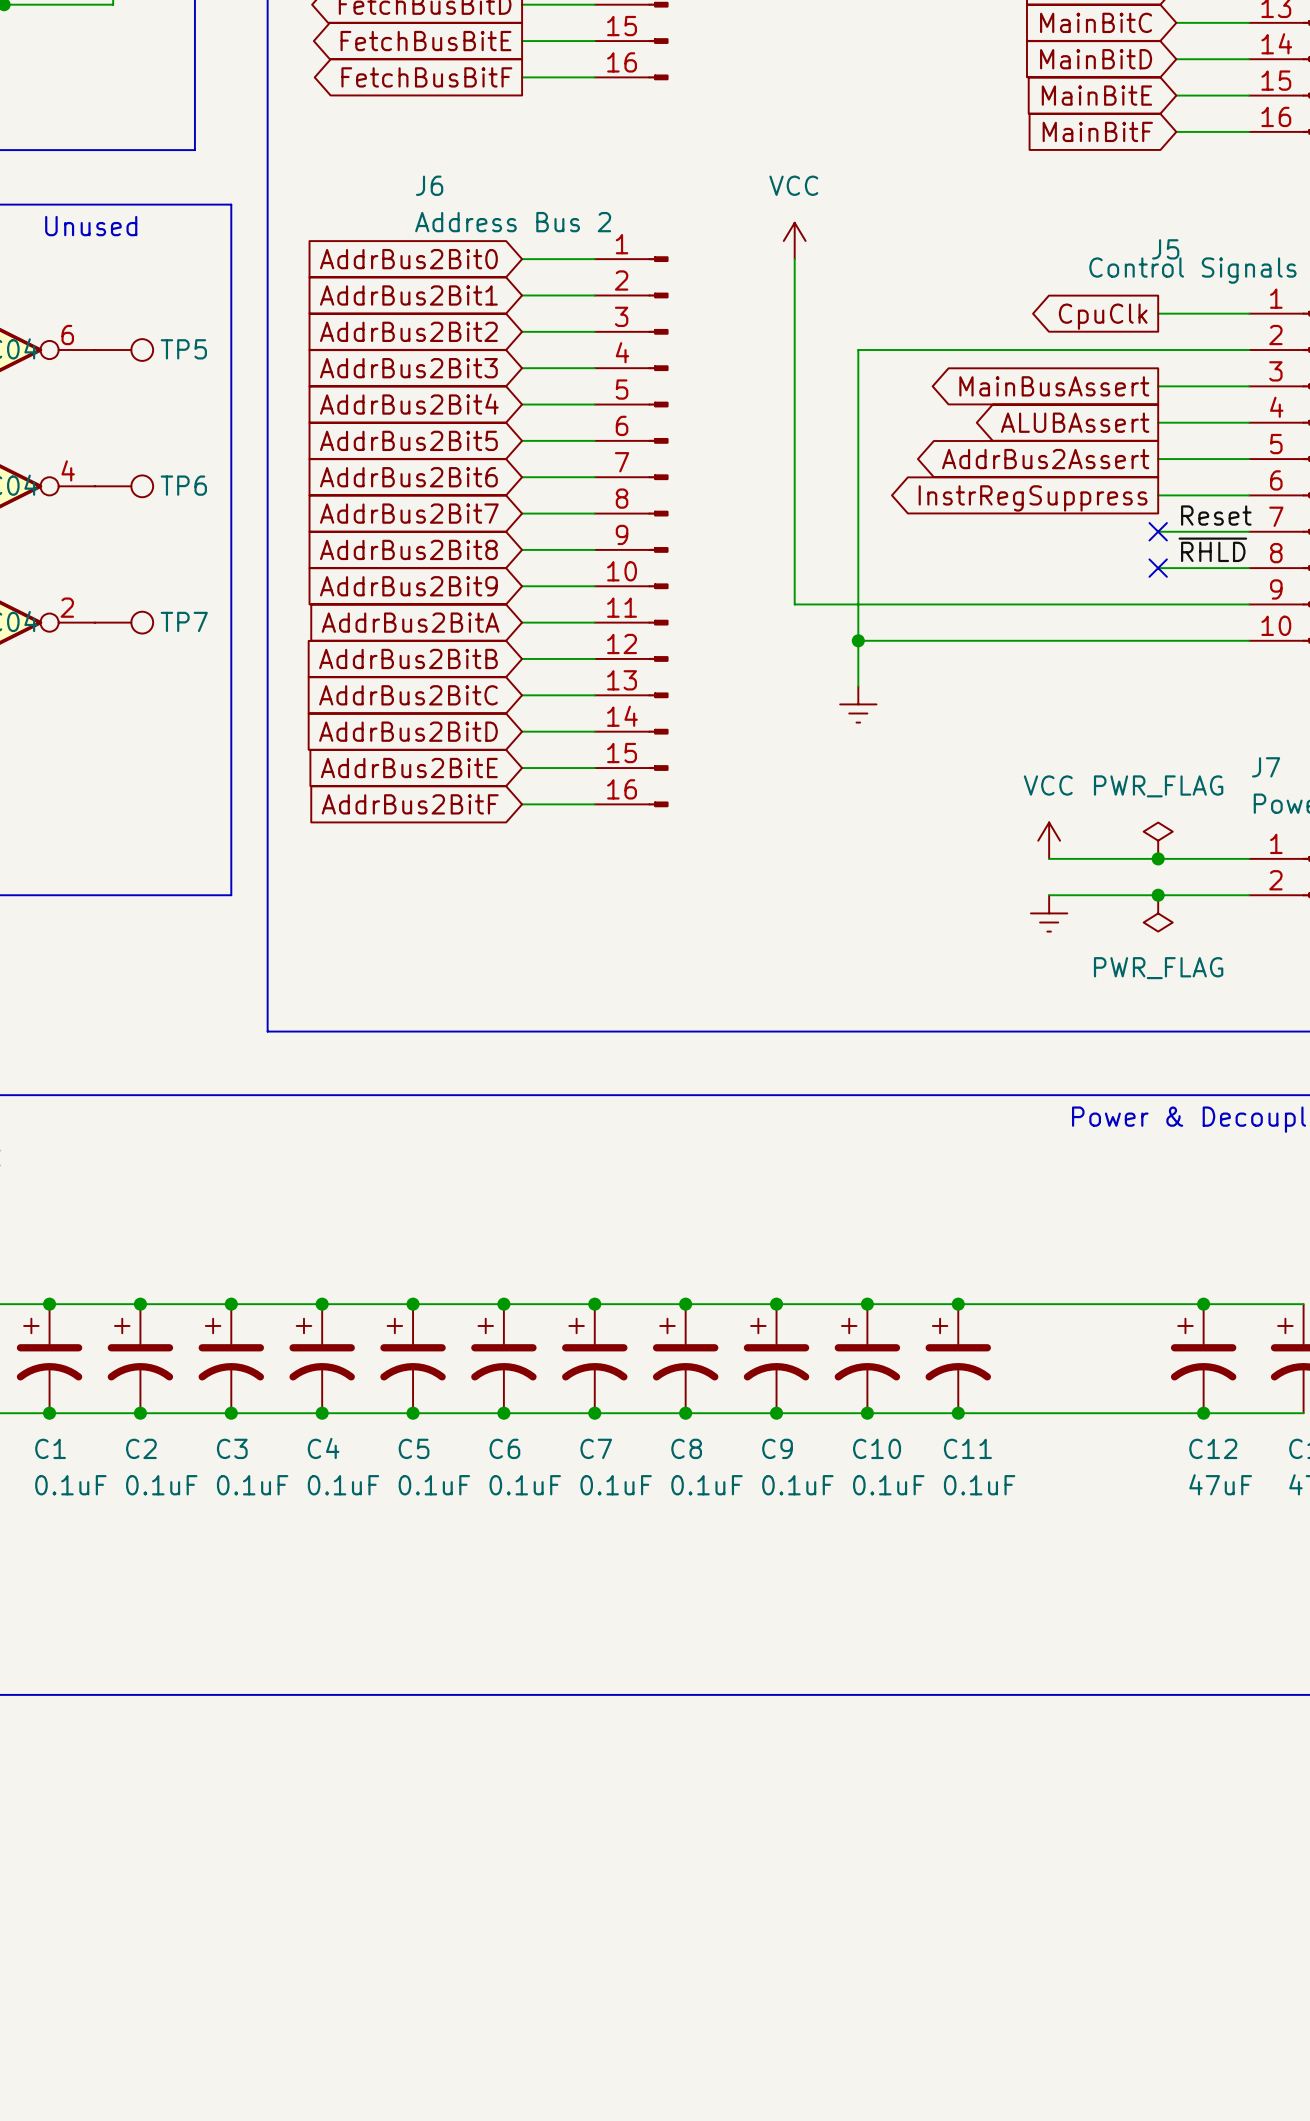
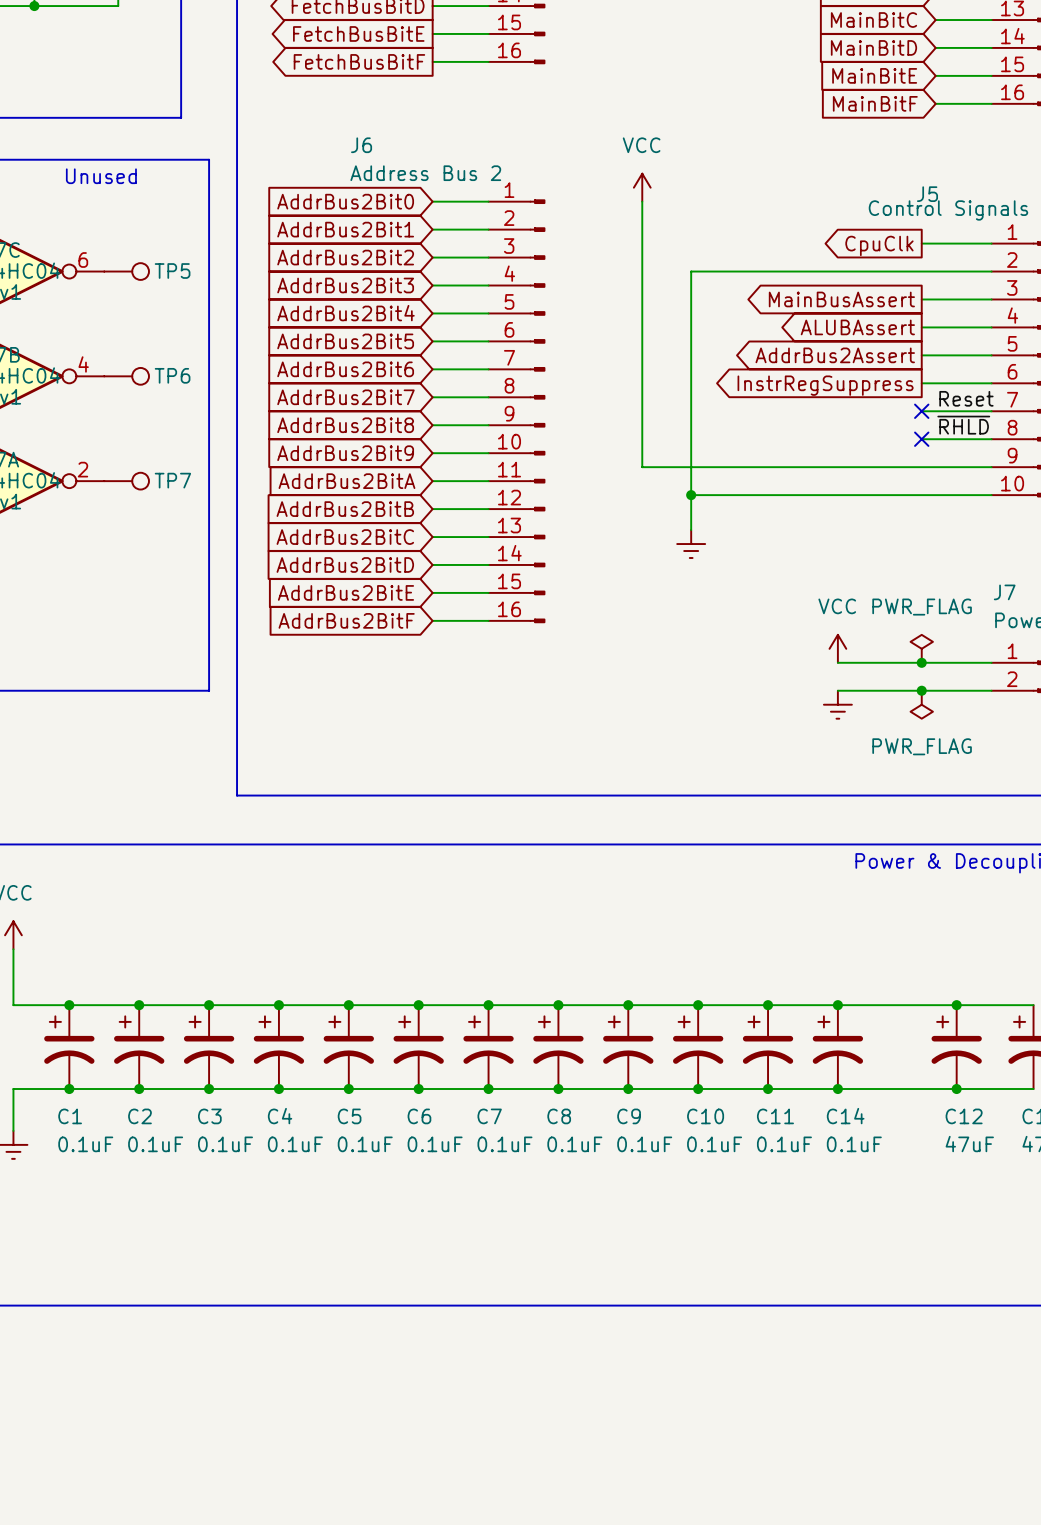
junction: none -> (837, 1005)
C14: none -> 0.1uF (837, 1047)
junction: none -> (837, 1089)

